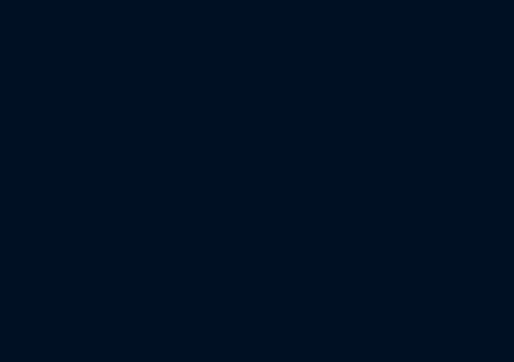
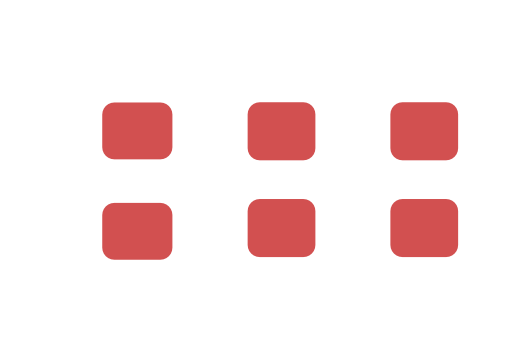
part: none -> (281, 179)
part: none -> (424, 179)
part: none -> (137, 181)

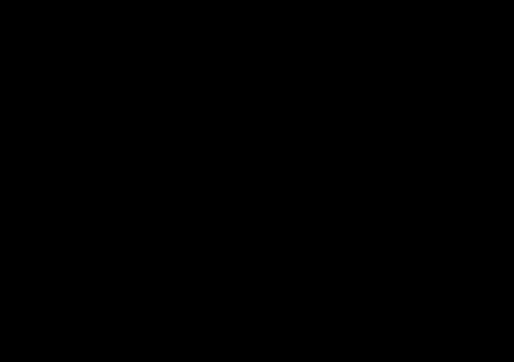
part: (281, 179) -> none
part: (424, 179) -> none
part: (137, 181) -> none

